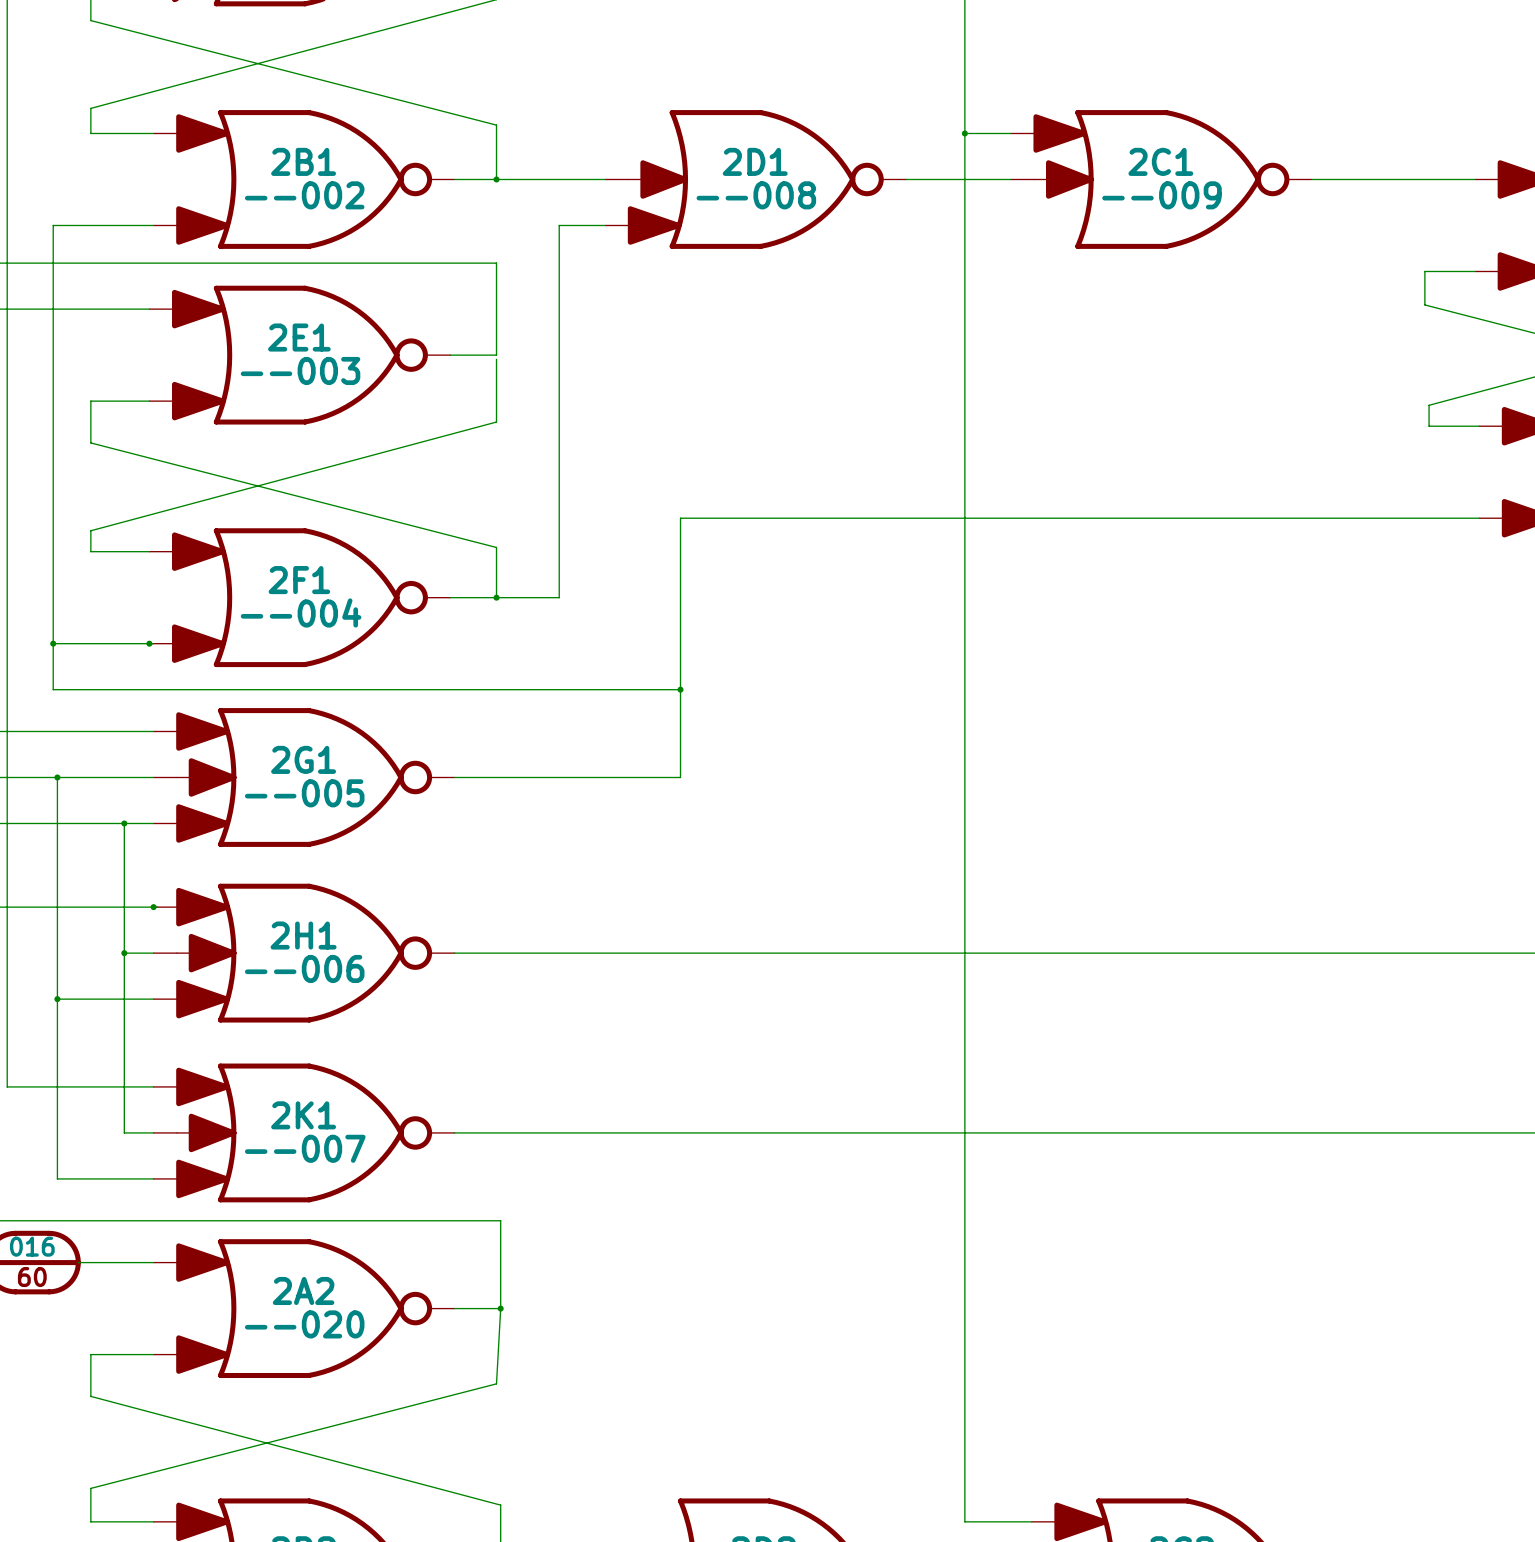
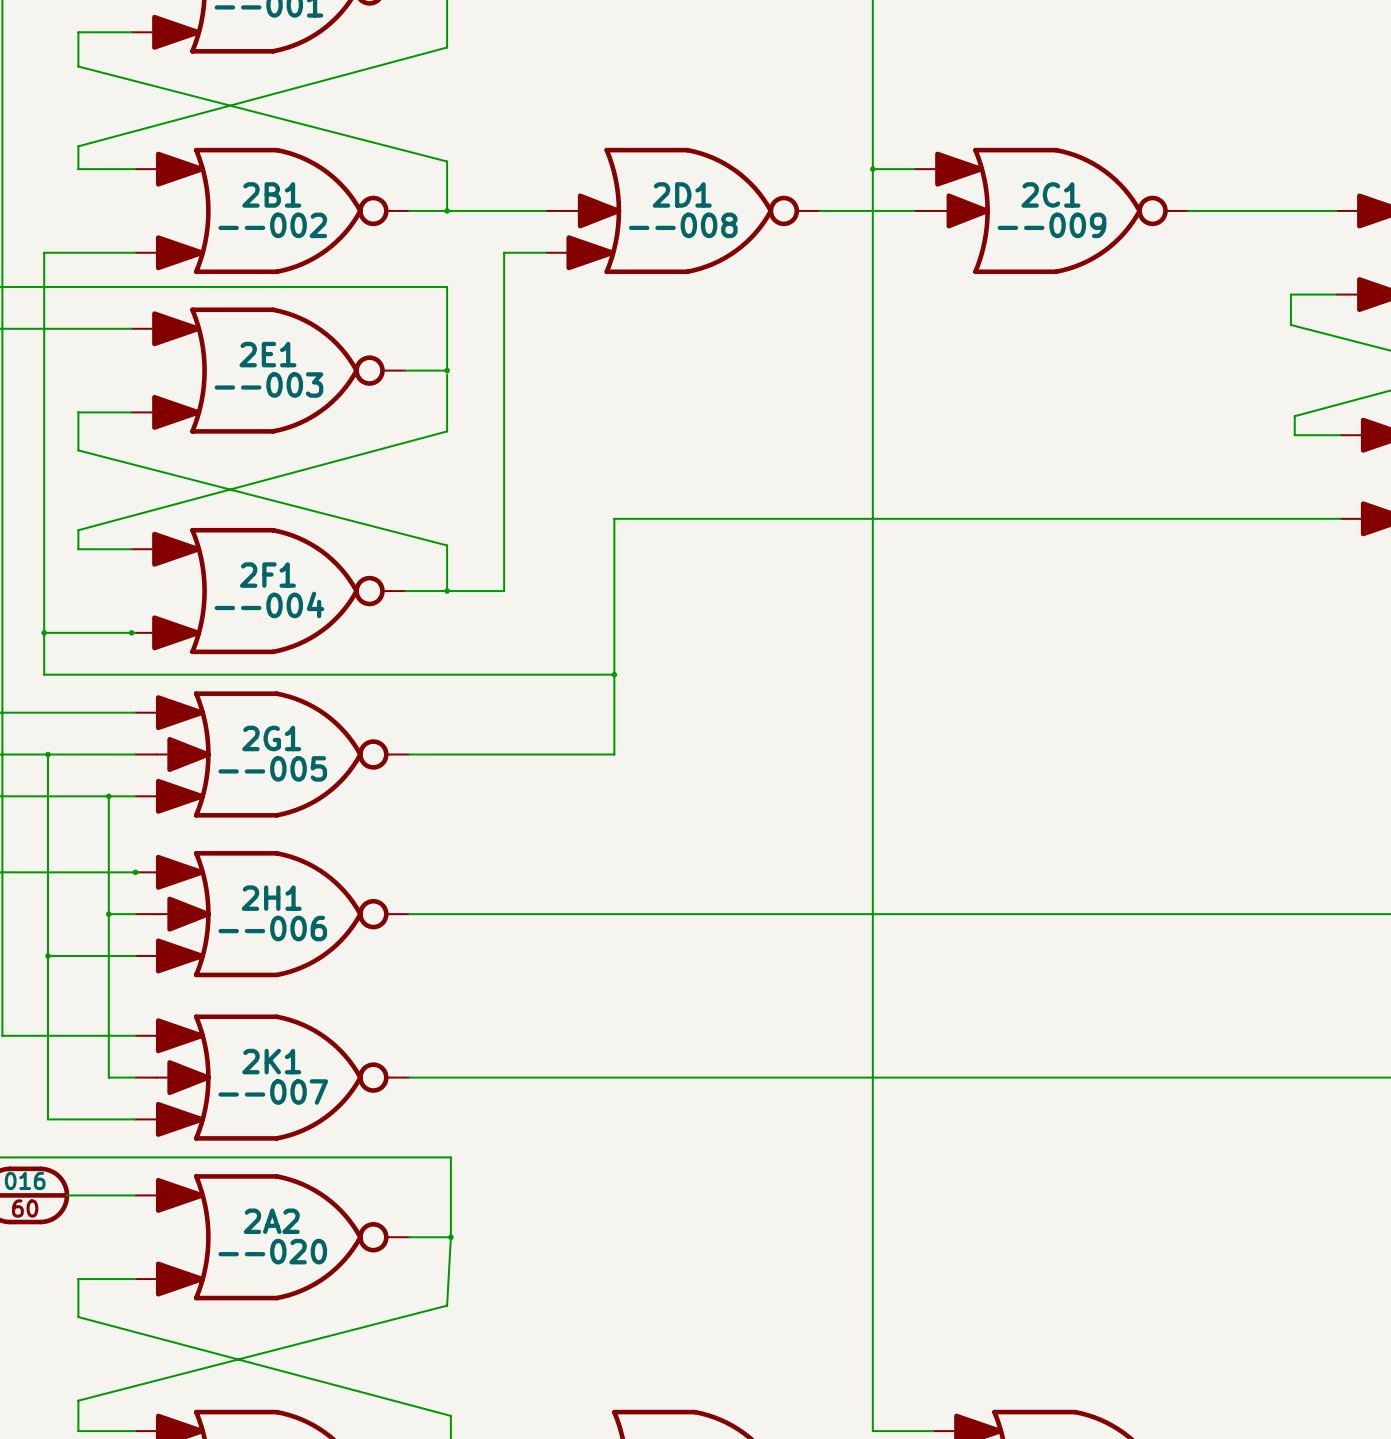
junction: none -> (447, 370)

